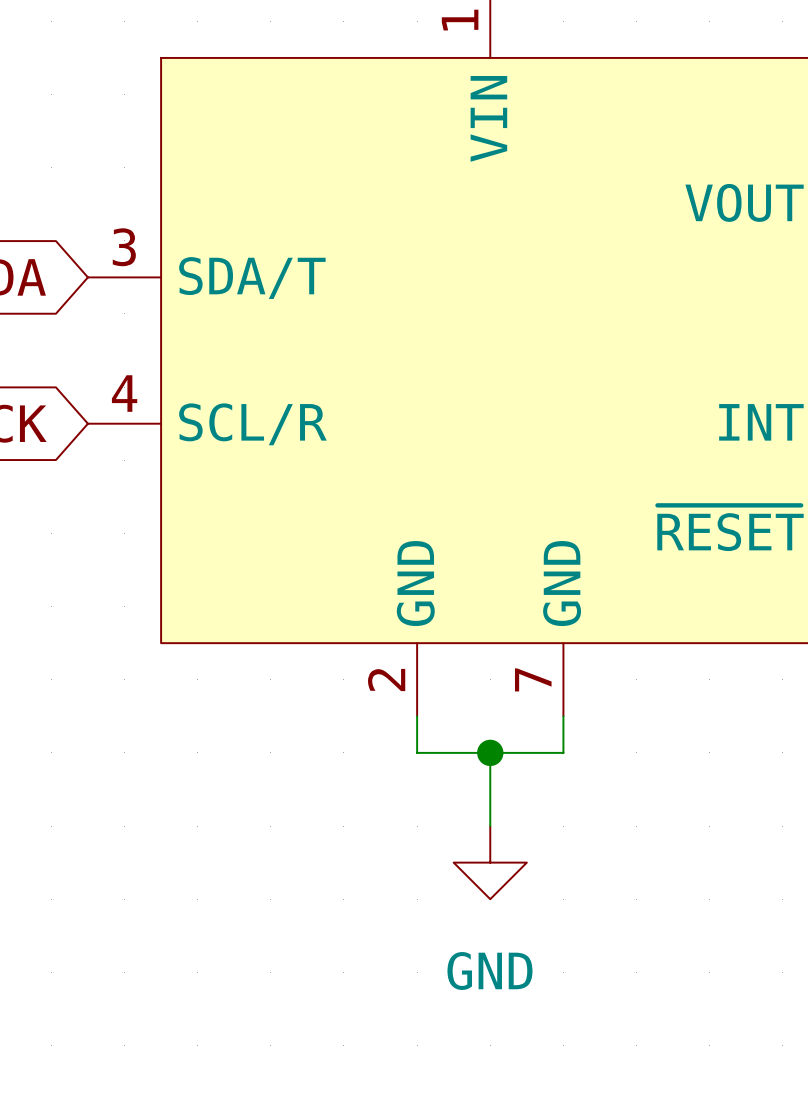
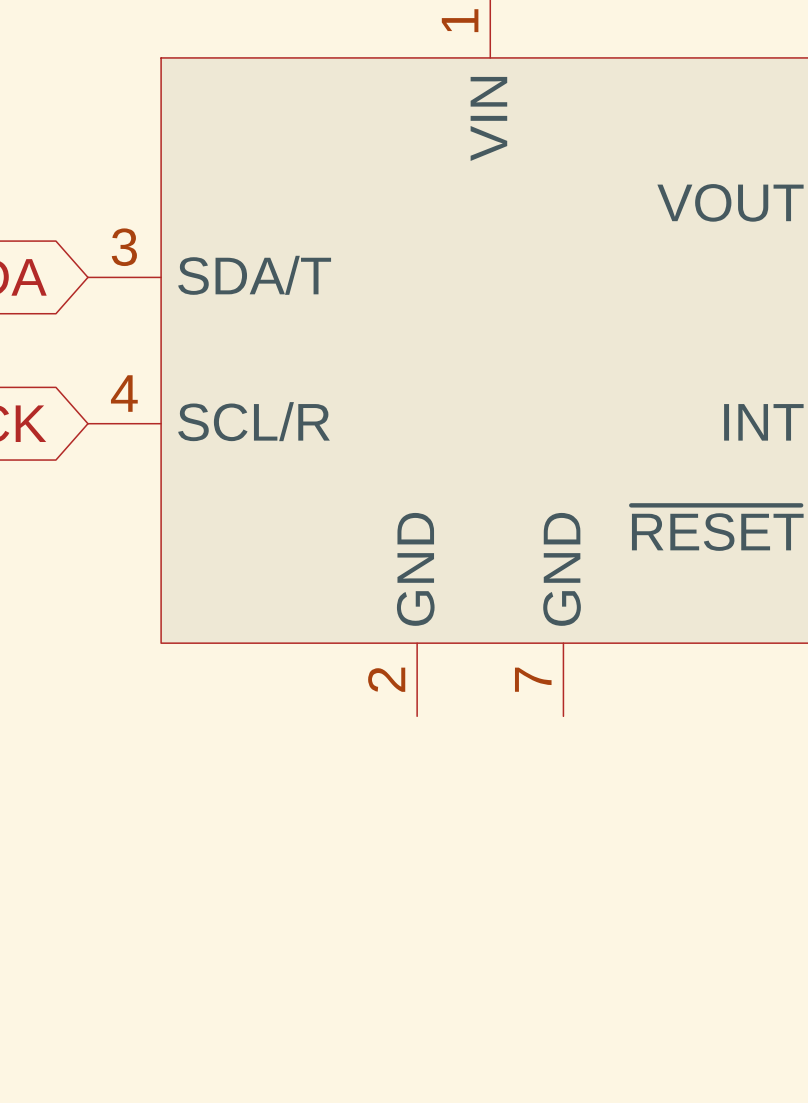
wire: (417, 716) (417, 752) (563, 752) (563, 716) -> none
wire: (490, 752) (490, 826) -> none
junction: (490, 752) -> none
power symbol: GND (490, 862) -> none

